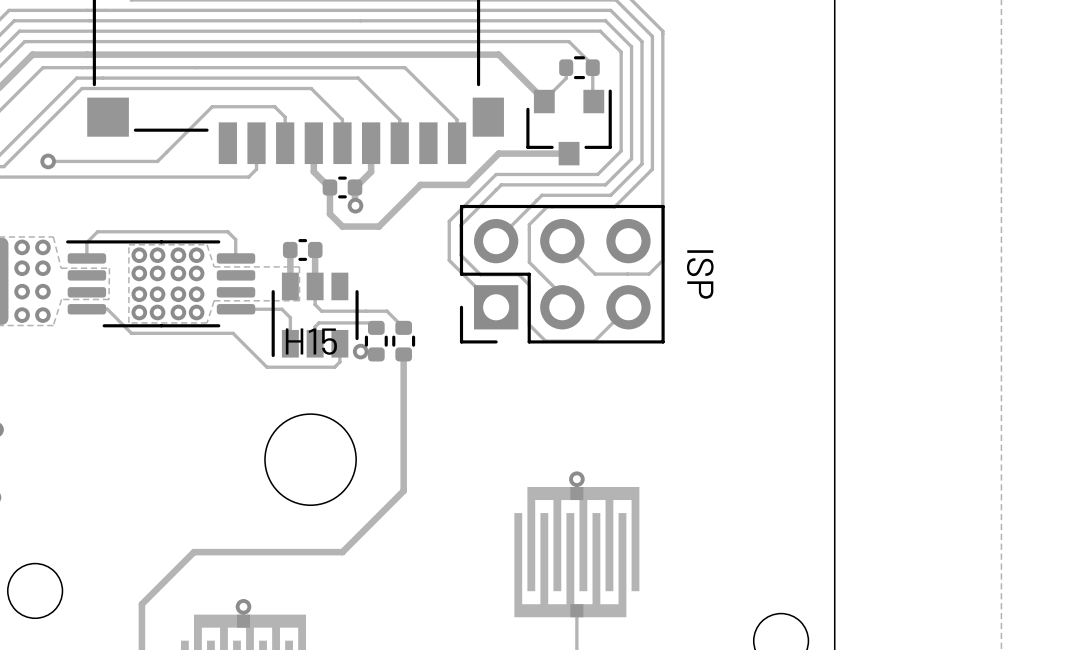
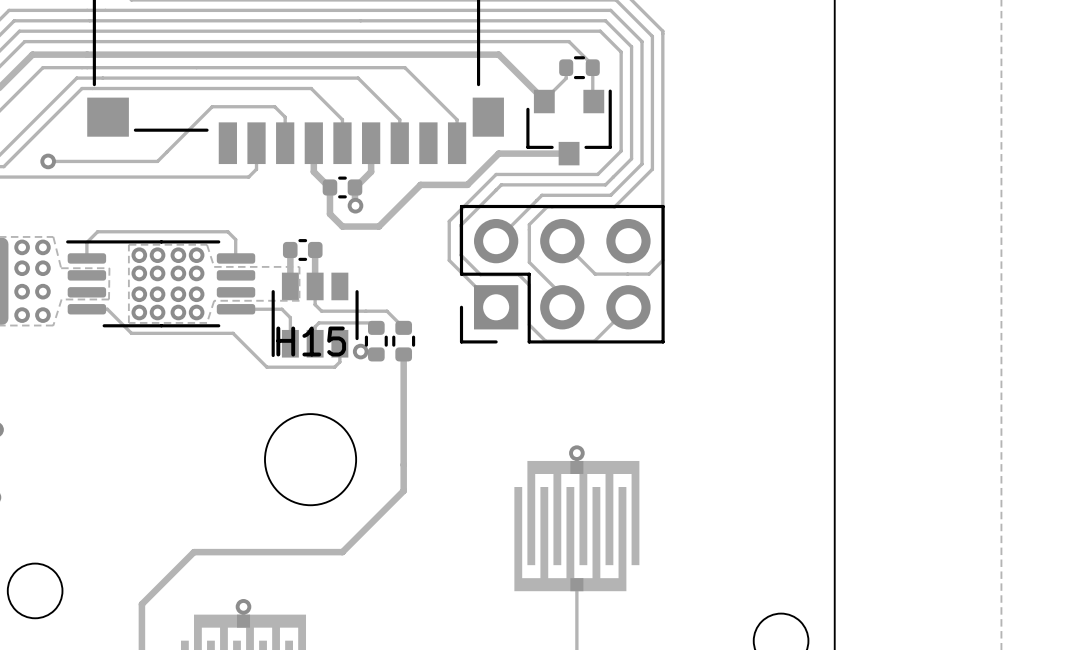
text: ISP (700, 274) -> none
via position: (576, 479) -> (576, 453)
part position: (576, 552) -> (576, 526)
track: none -> (576, 584) (576, 610)

